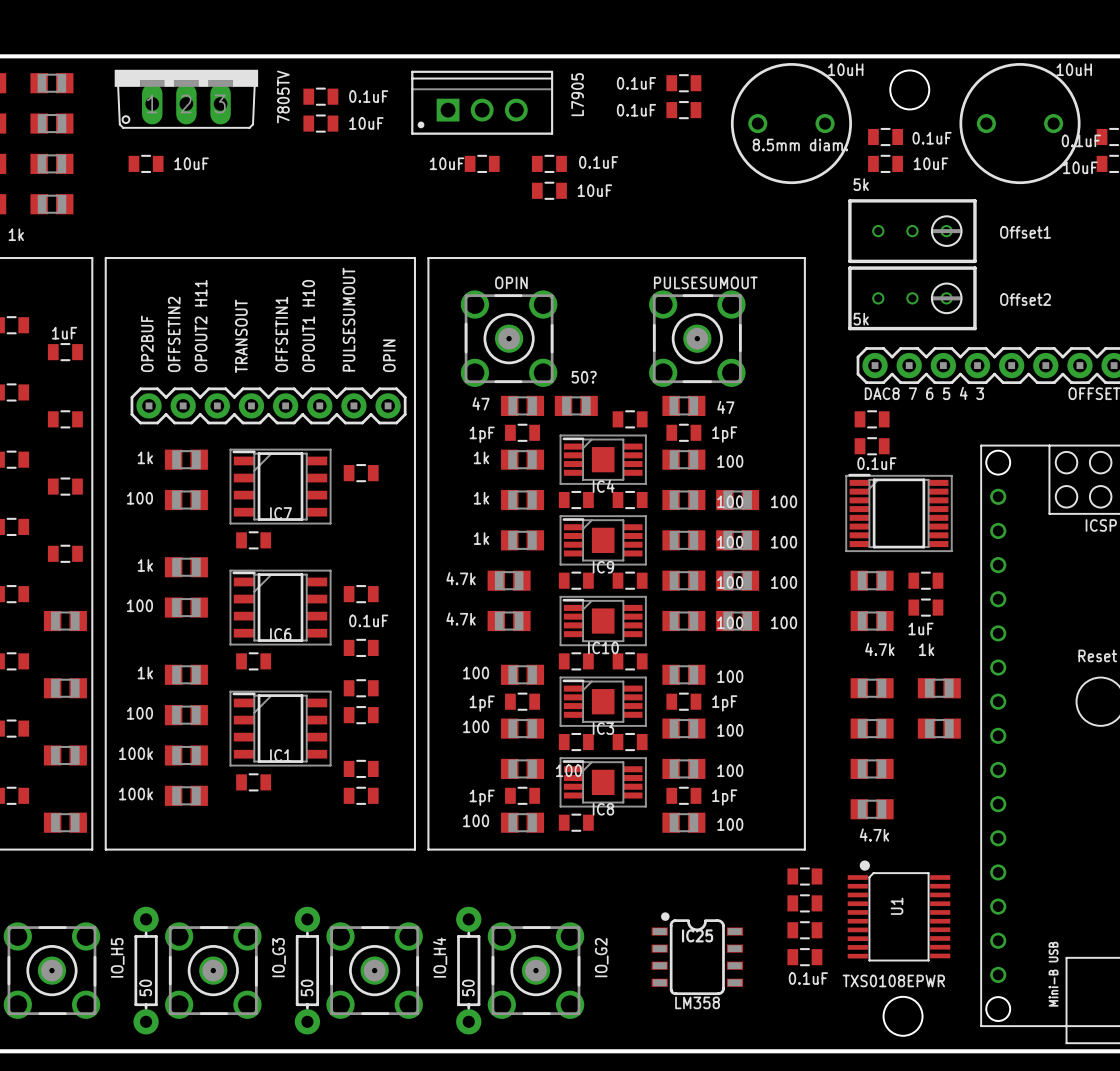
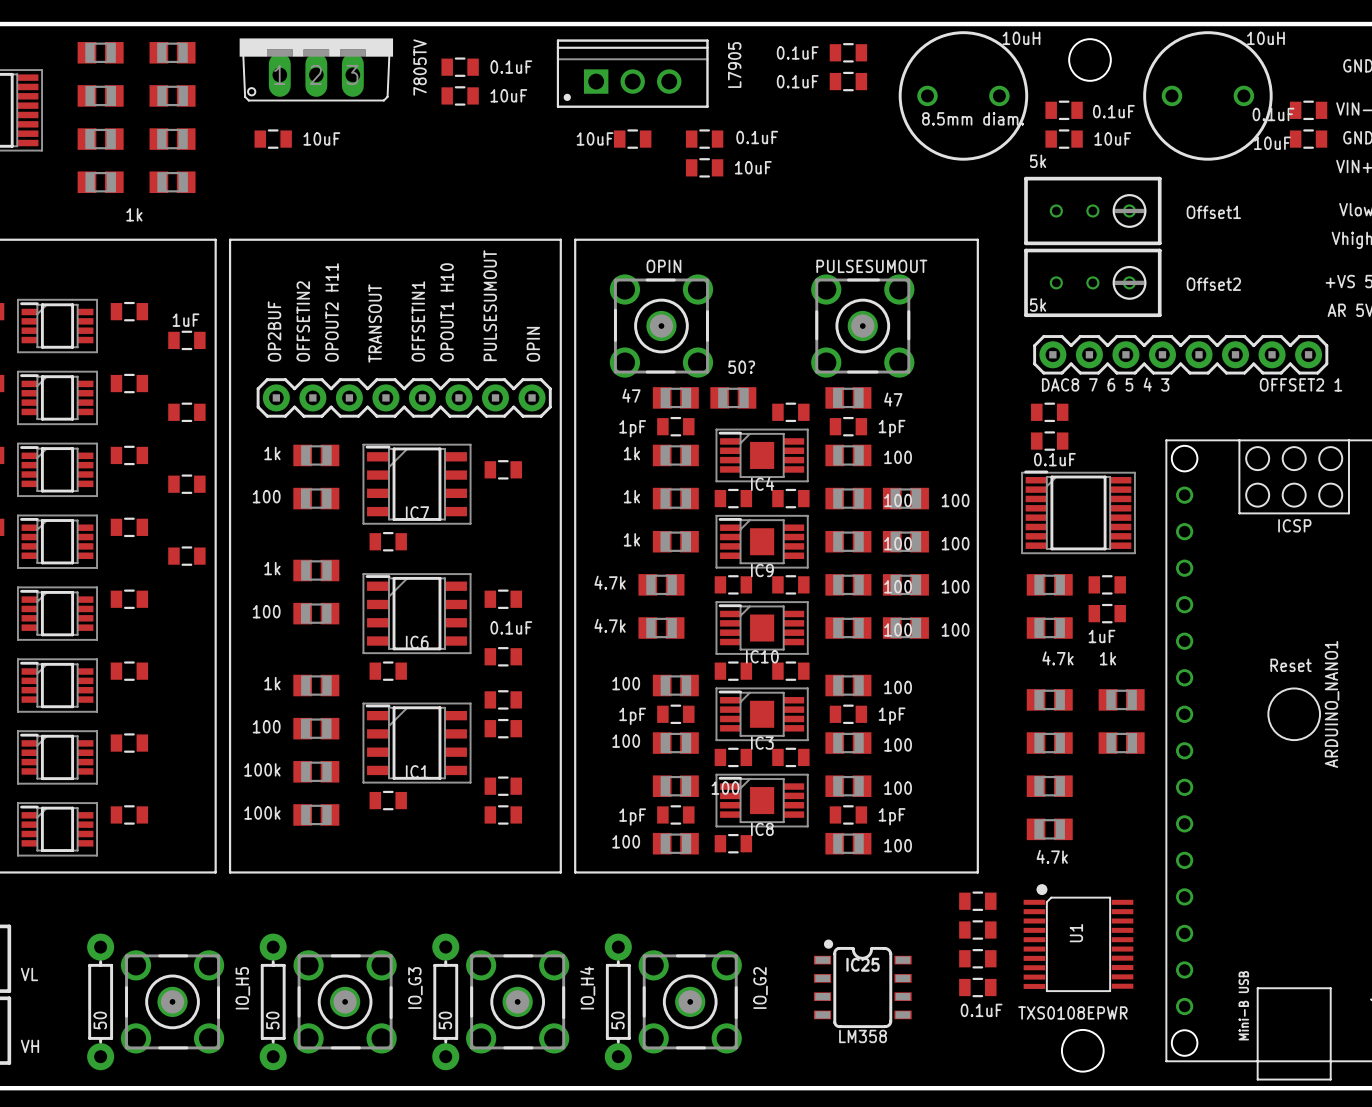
part: (65, 621) -> none
part: (65, 688) -> none
part: (65, 755) -> none
part: (65, 822) -> none

